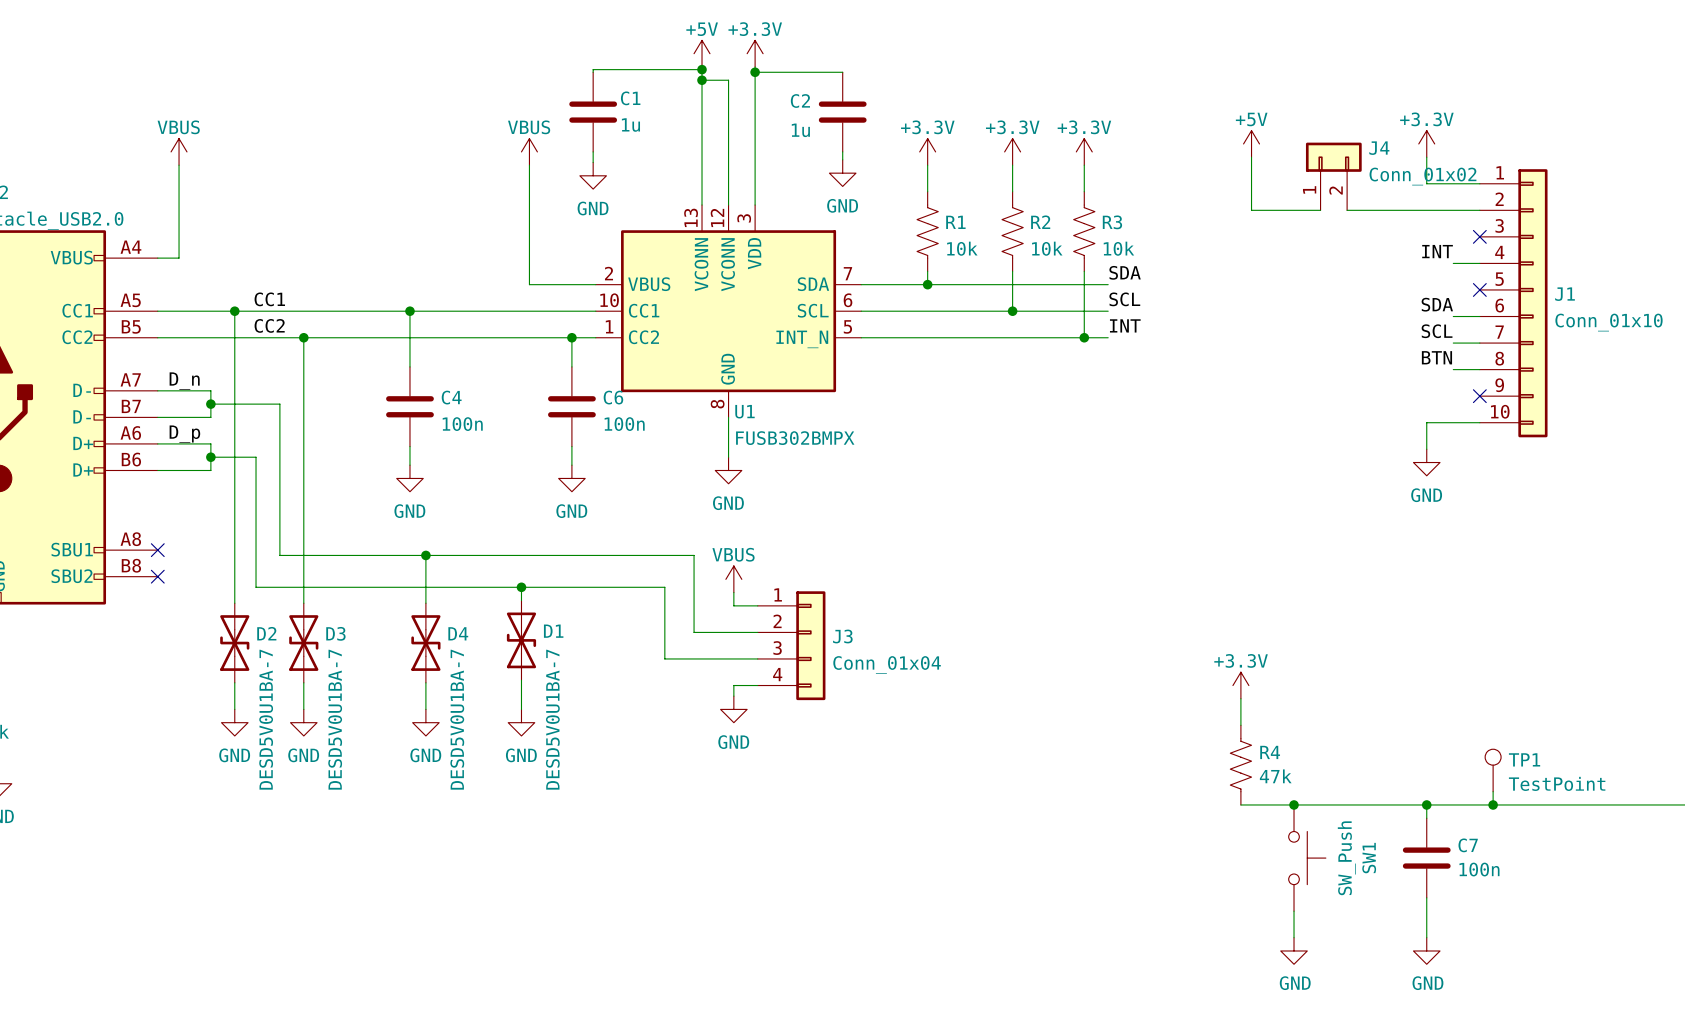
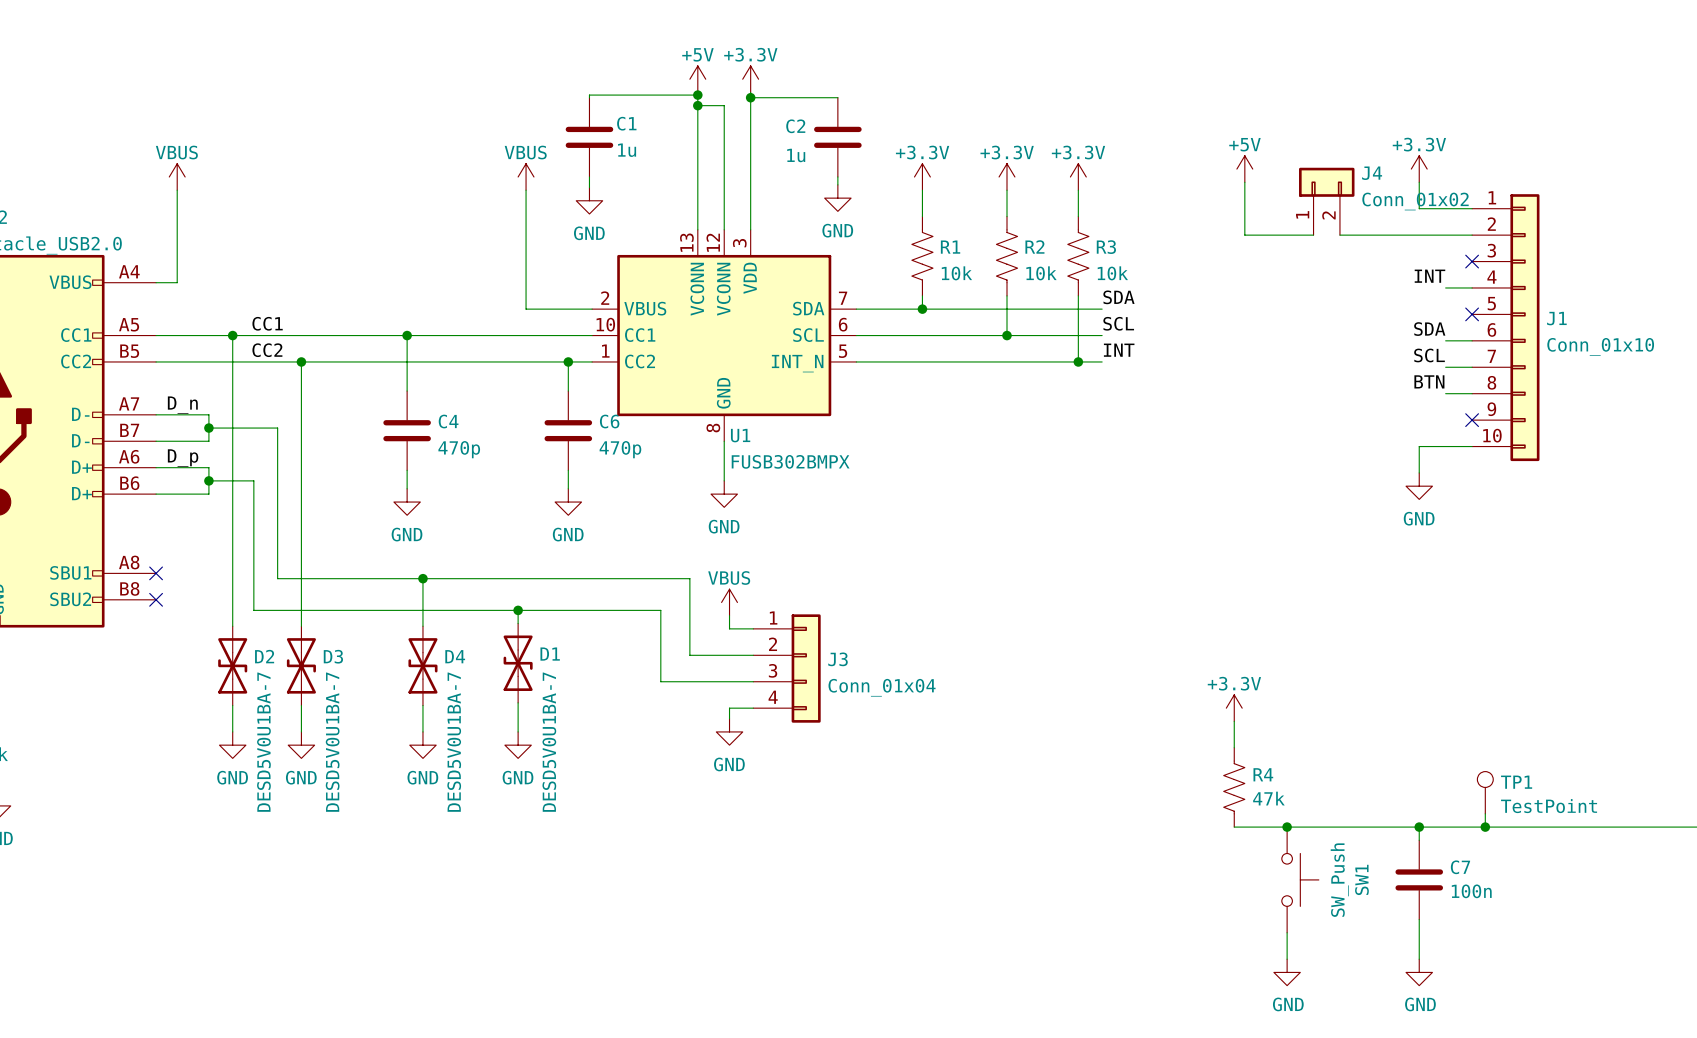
C4 value: 100n (462, 424) -> 470p (459, 449)
C6 value: 100n (624, 424) -> 470p (620, 449)

